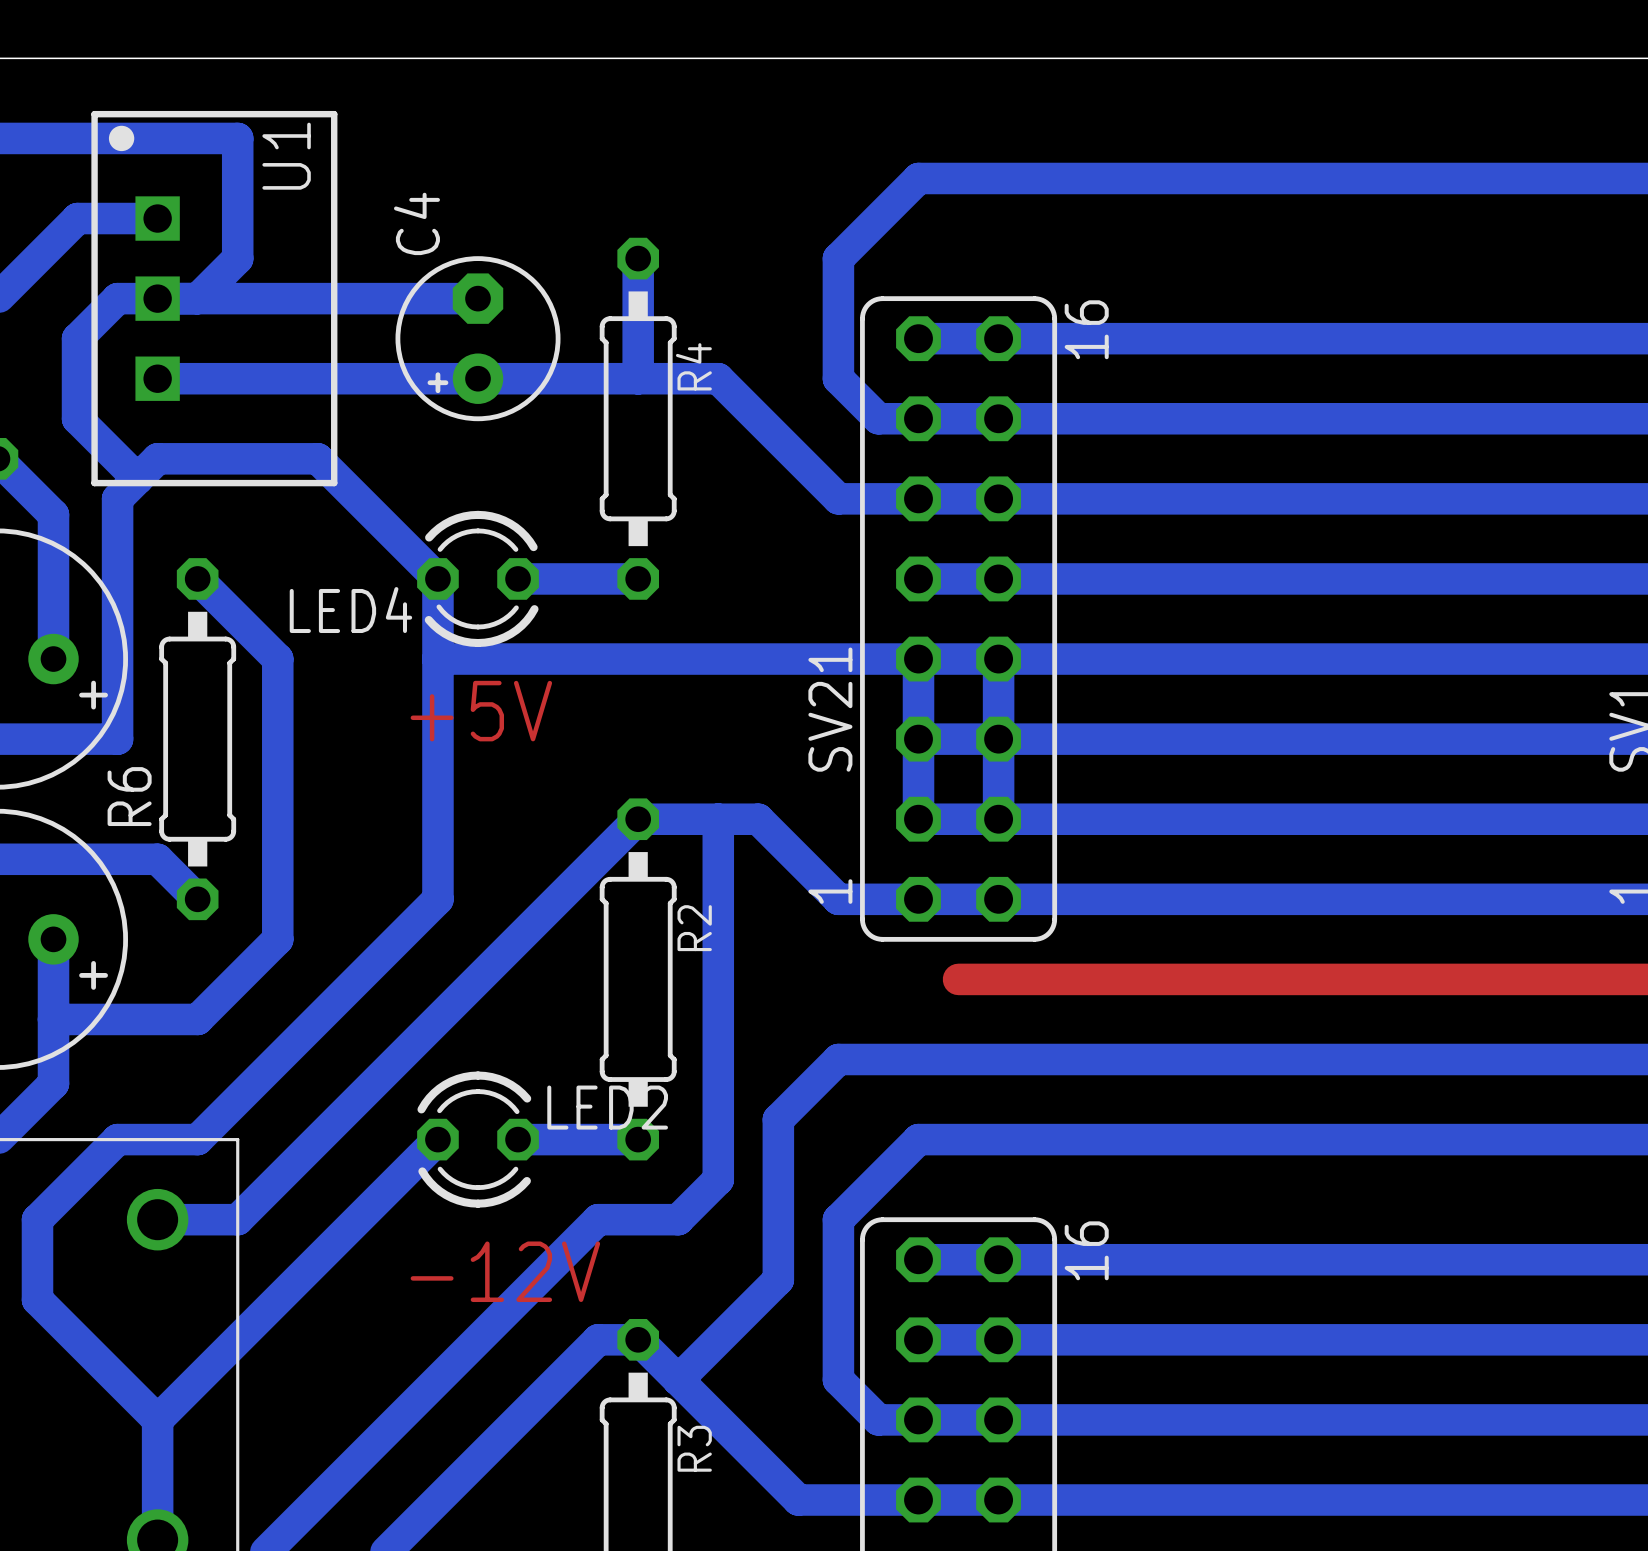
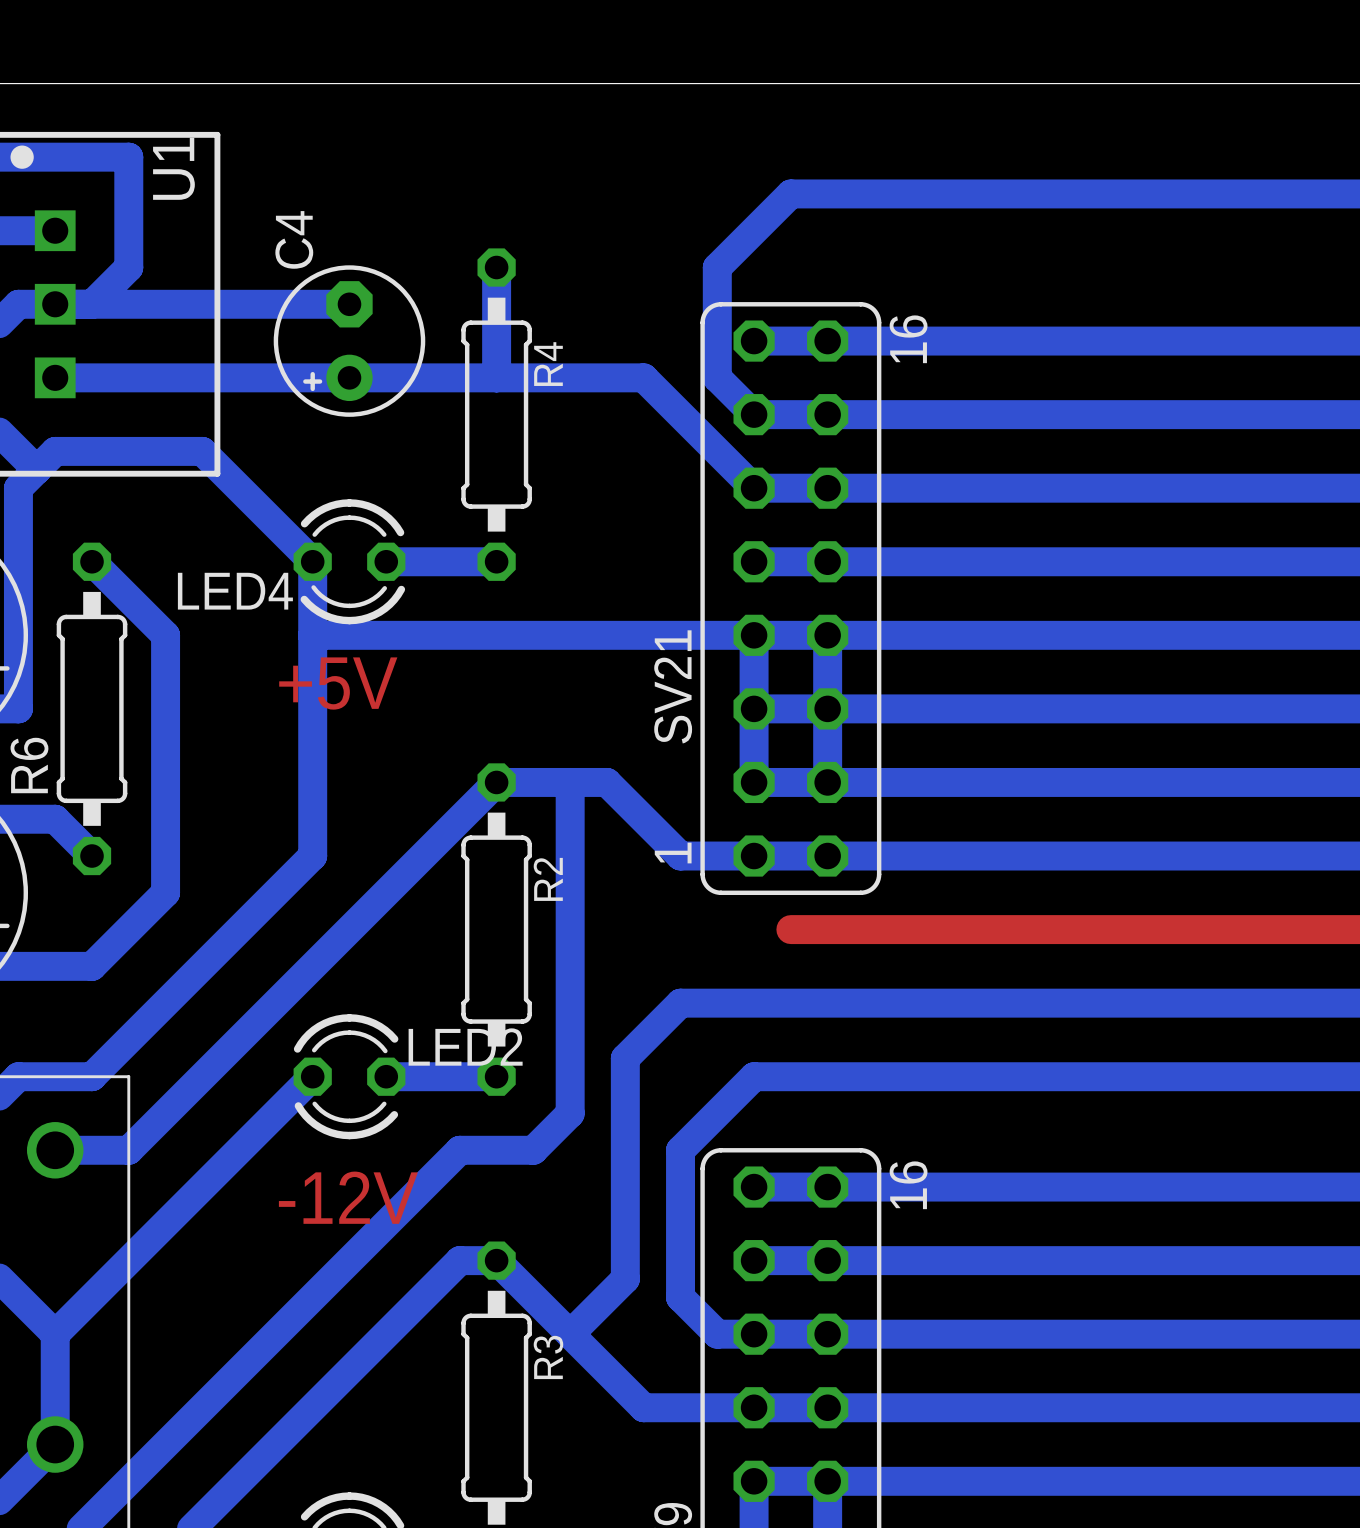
bottom track: (958, 178) (918, 178) (838, 258) (838, 378) (878, 418) (918, 418) -> (790, 193) (717, 267) (717, 377) (754, 414)
bottom track: (718, 378) (838, 498) (918, 498) -> (570, 377) (643, 377) (754, 488)
bottom track: (778, 1279) (678, 1379) -> (625, 1205) (625, 1279) (570, 1334)

